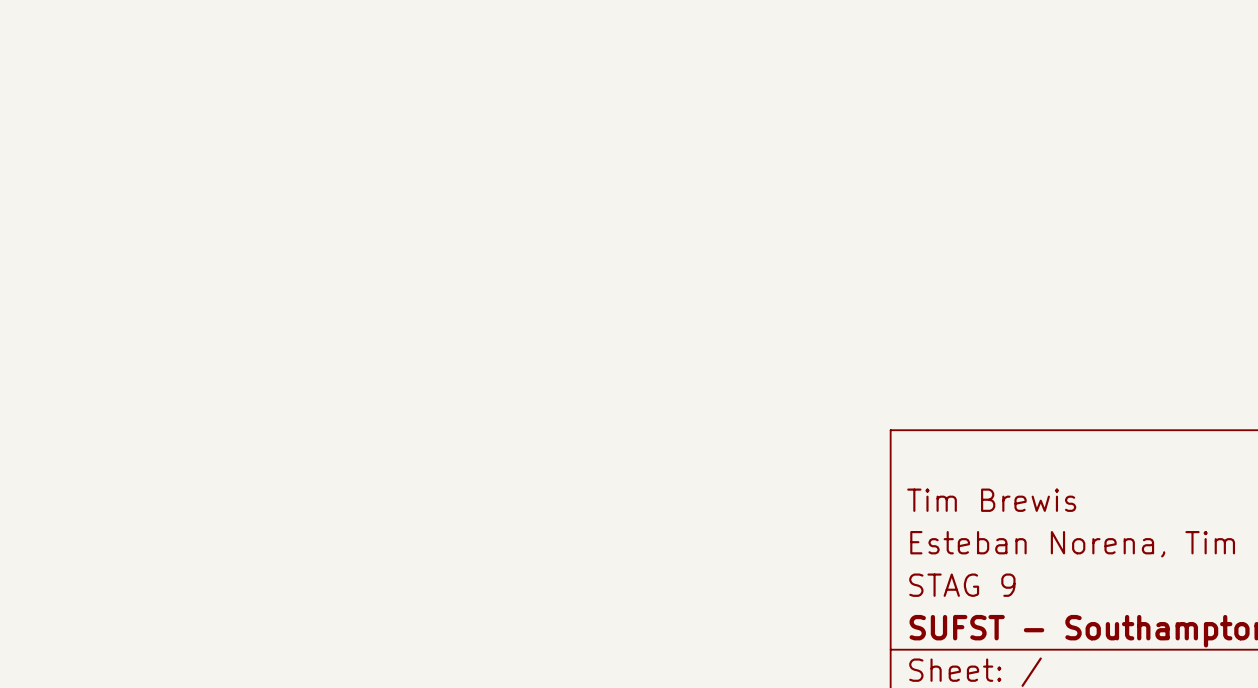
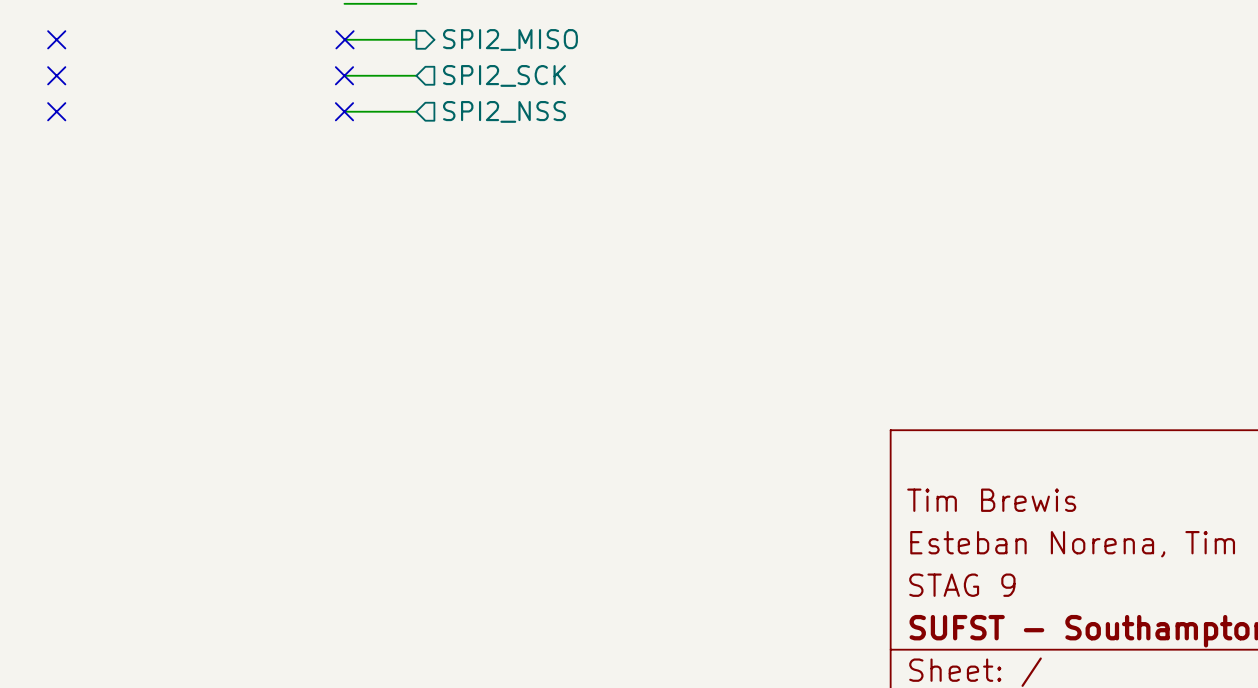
wire: none -> (344, 3) (416, 3)
no-connect mark: none -> (56, 39)
wire: none -> (344, 39) (416, 39)
no-connect mark: none -> (344, 39)
sheet pin: none -> SPI2_MISO (510, 39)
no-connect mark: none -> (56, 75)
wire: none -> (344, 75) (416, 75)
no-connect mark: none -> (344, 75)
sheet pin: none -> SPI2_SCK (504, 75)
no-connect mark: none -> (56, 111)
wire: none -> (344, 111) (416, 111)
no-connect mark: none -> (344, 111)
sheet pin: none -> SPI2_NSS (504, 111)

